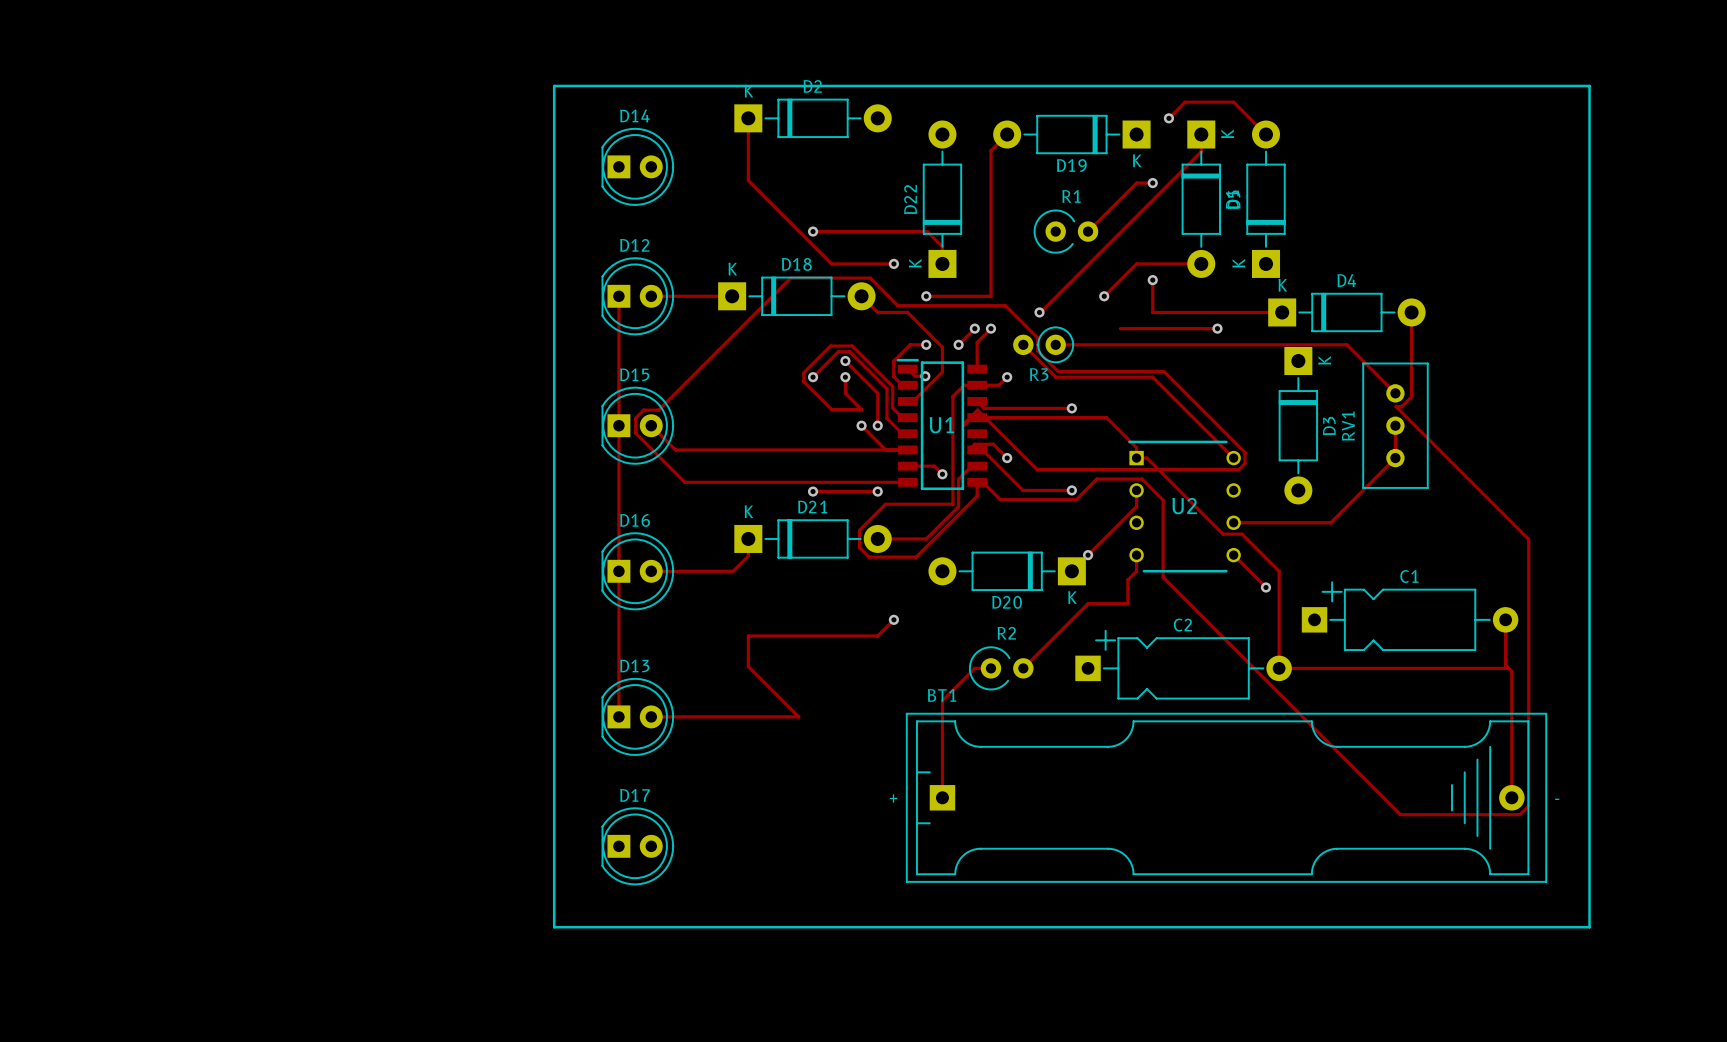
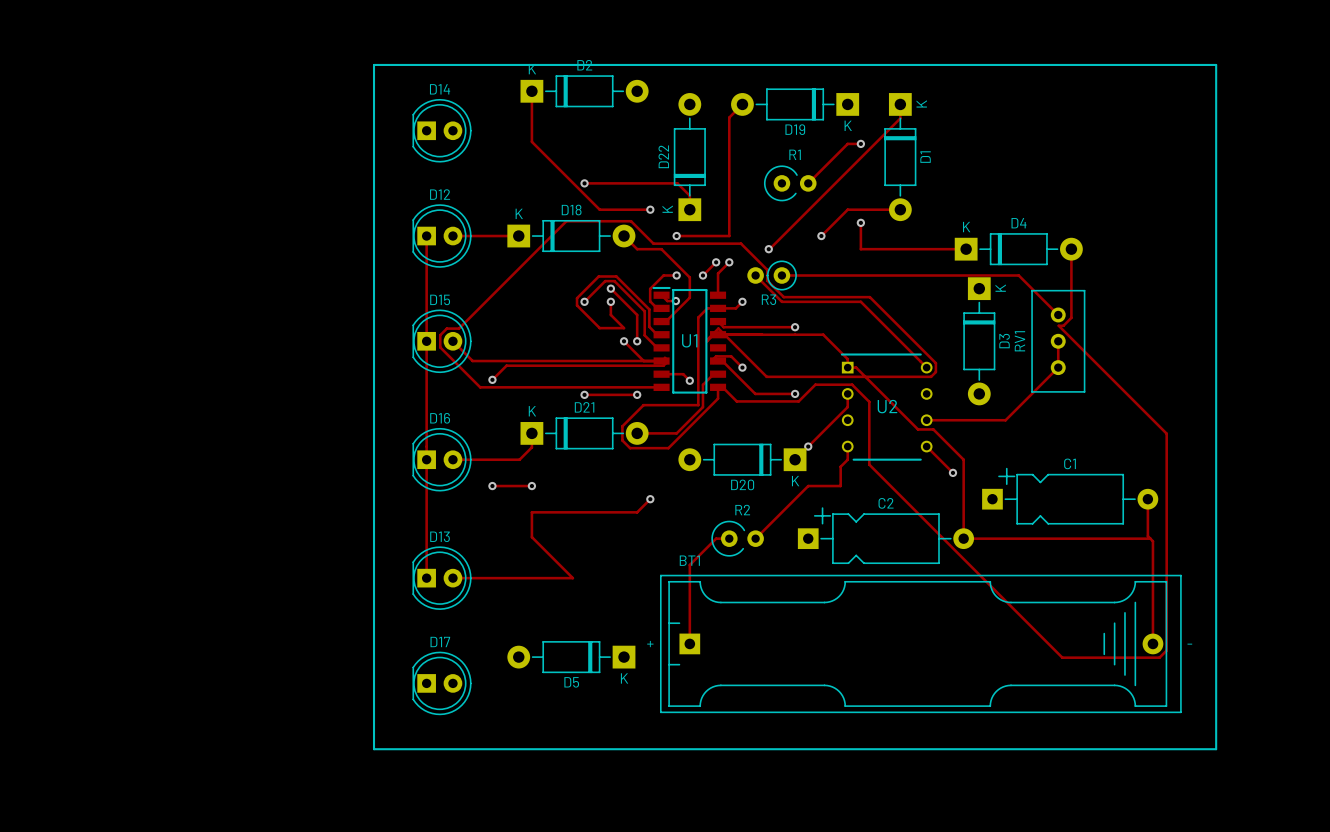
track: (1168, 118) (1185, 102) (1233, 102) (1266, 134) -> none
via: (1168, 118) -> none
D5 rotation: 0° (1266, 199) -> 90° counterclockwise (571, 657)
D5 position: (1266, 199) -> (571, 657)
track: (1120, 328) (1217, 328) -> none
via: (1217, 328) -> none
track: none -> (664, 357) (666, 362) (663, 365) (506, 365) (492, 379)
via: none -> (492, 379)
track: none -> (492, 486) (531, 486)
via: none -> (492, 486)
via: none -> (531, 486)

